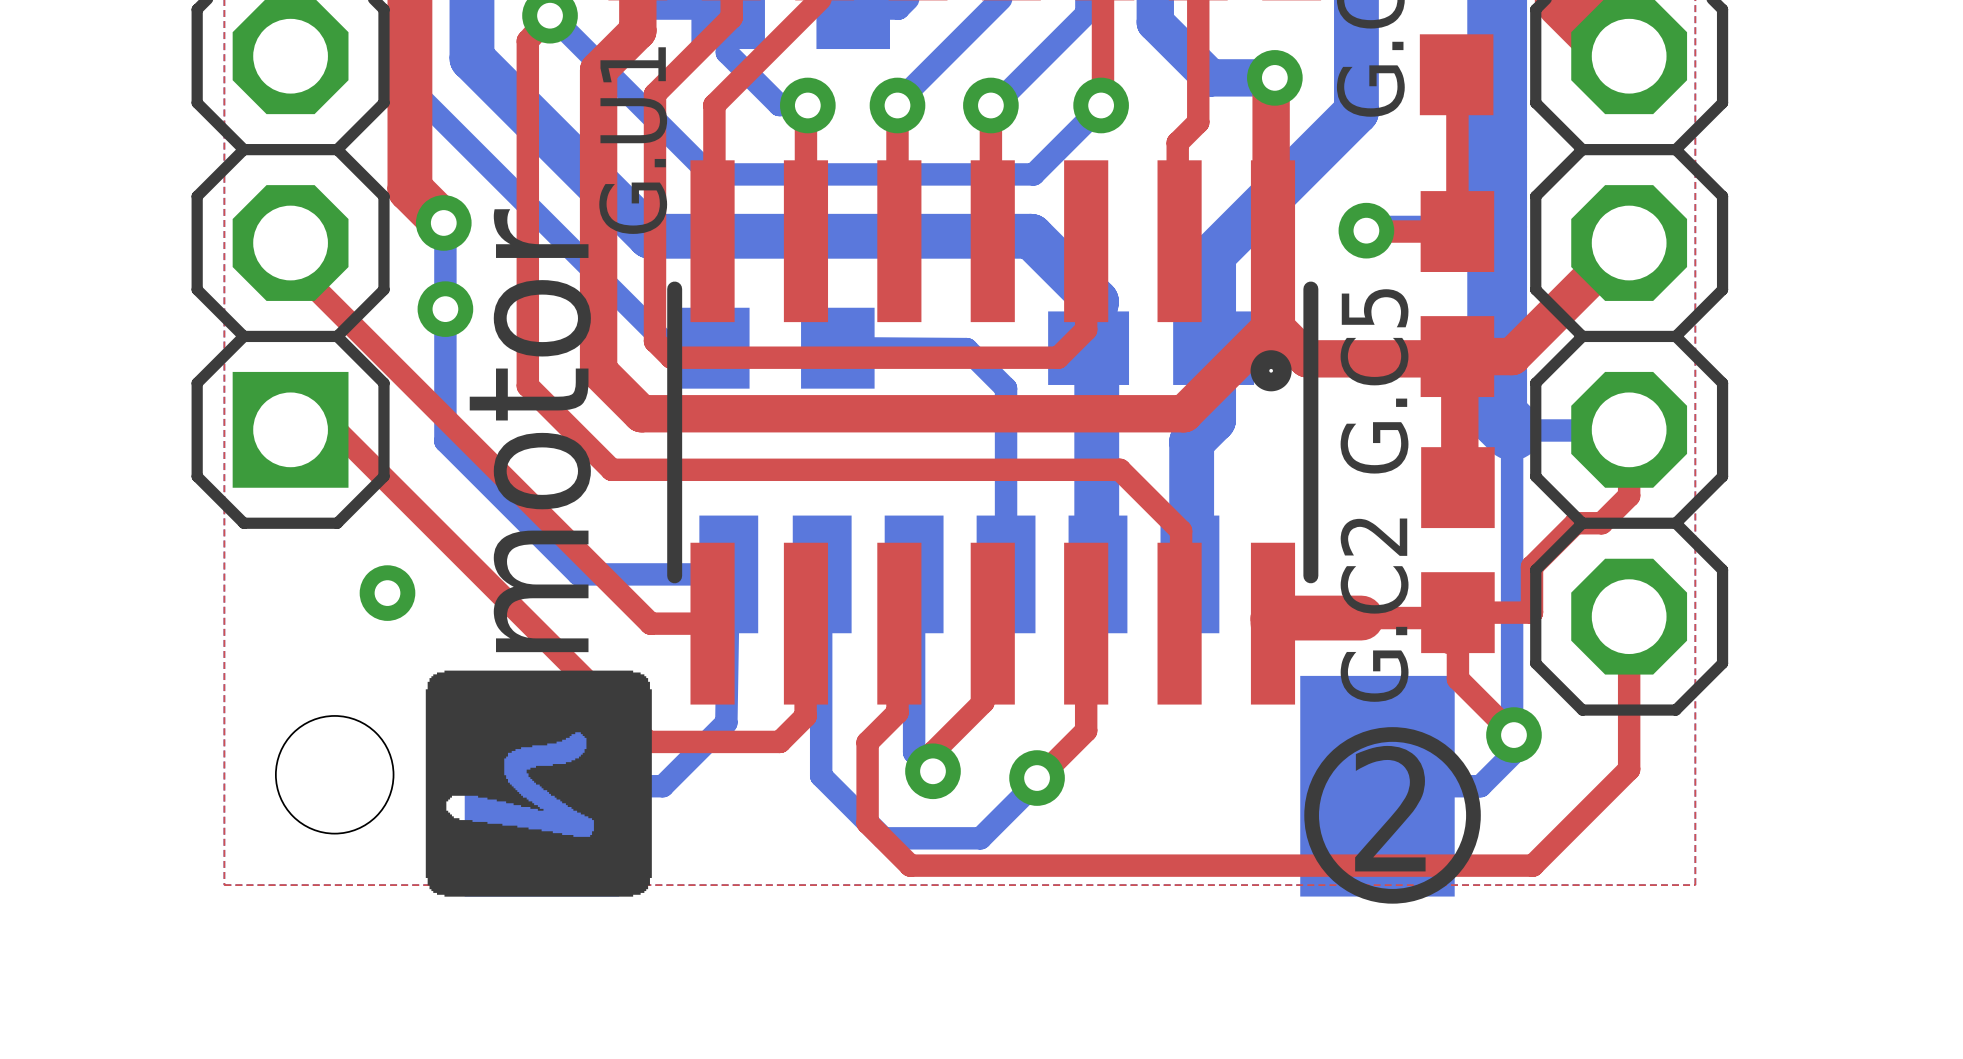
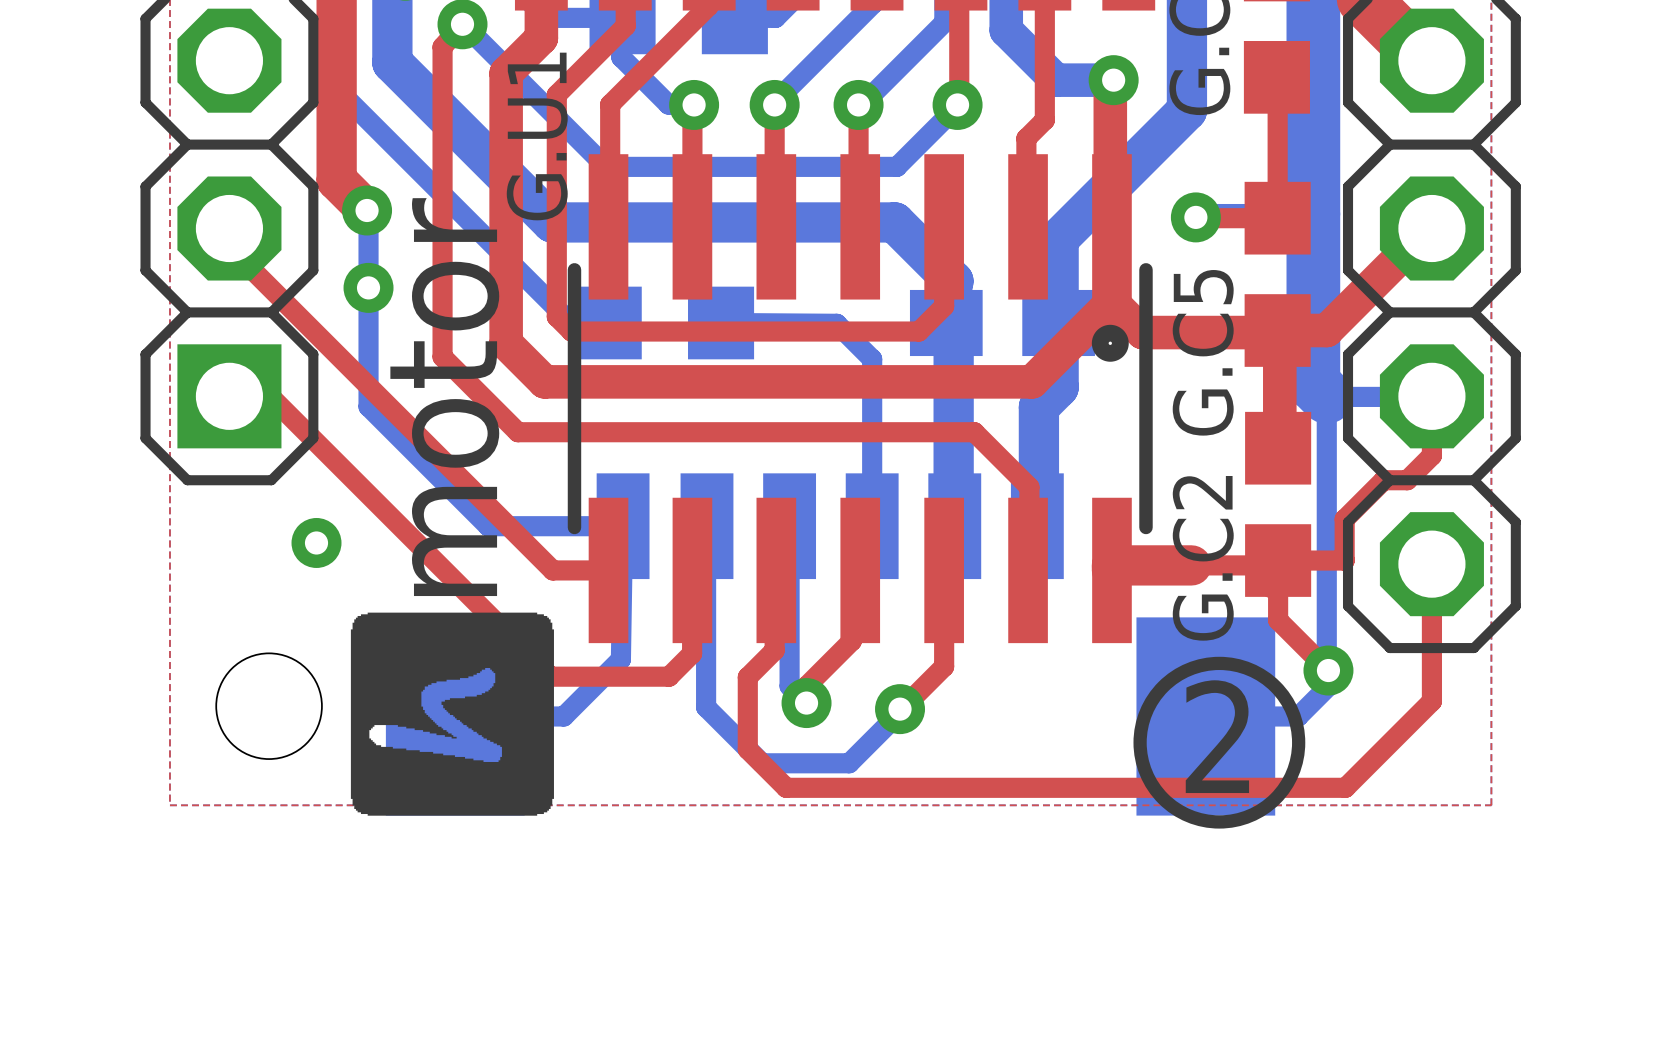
drawing shape: [1304, 727, 1481, 904] -> [1133, 656, 1306, 829]

